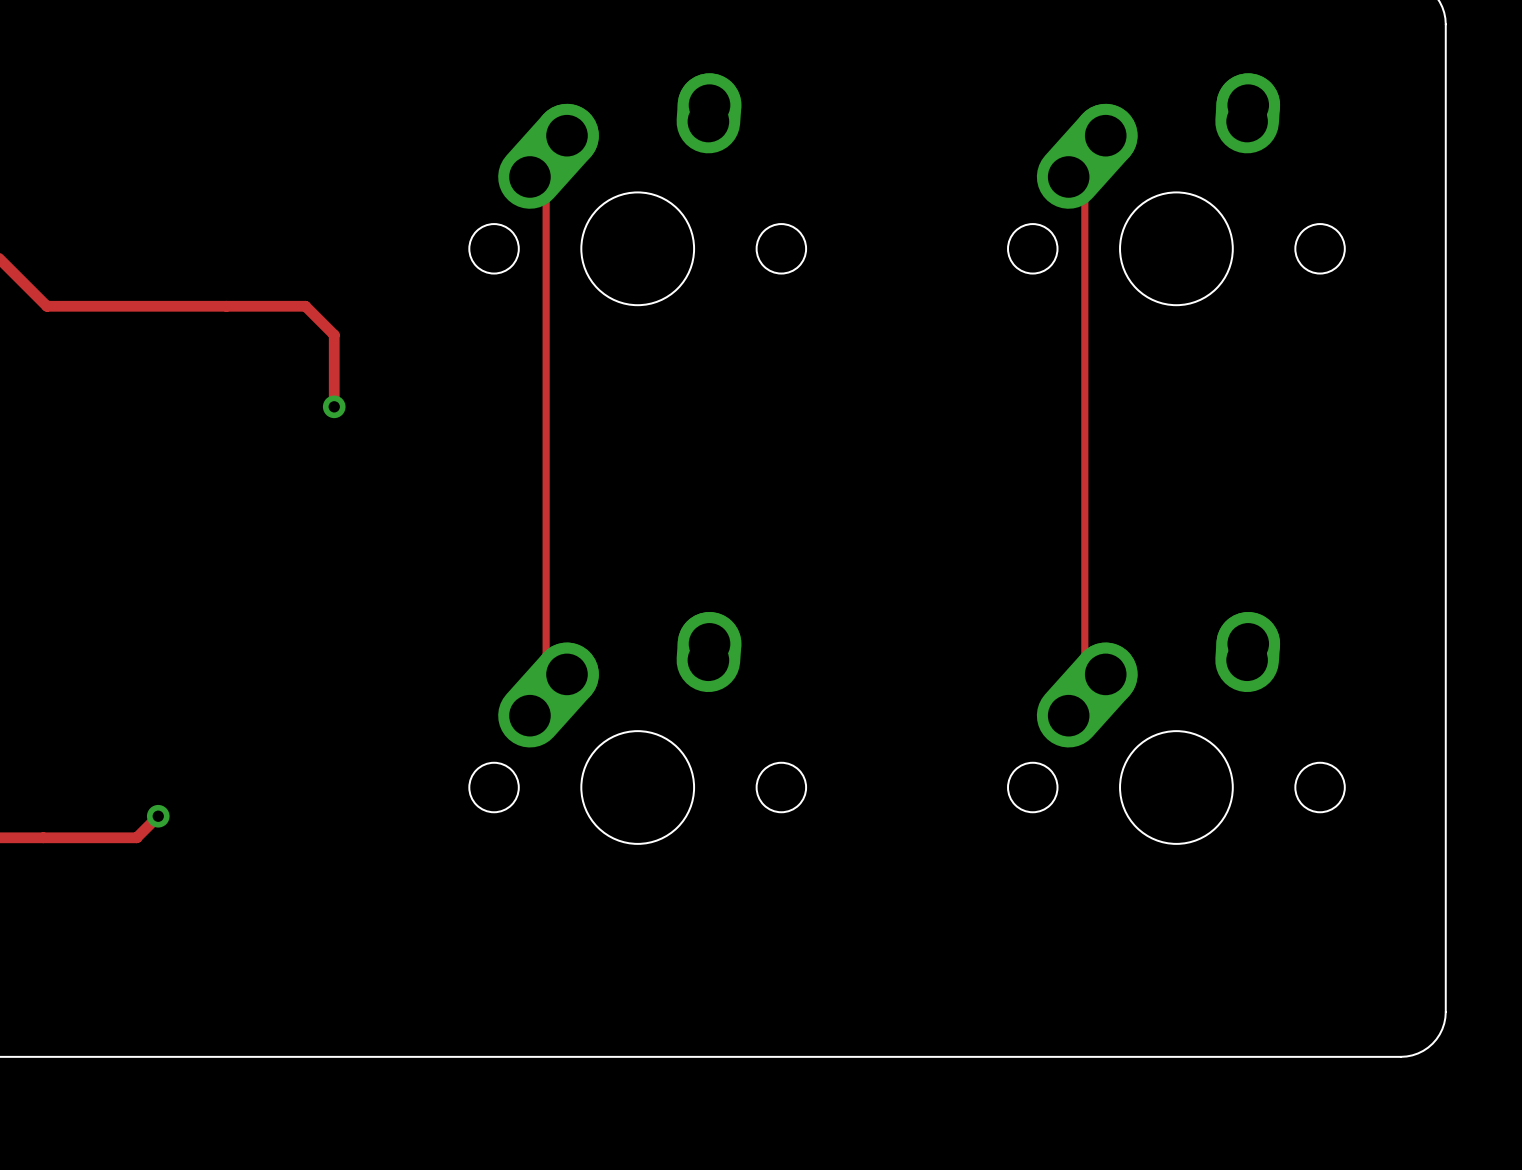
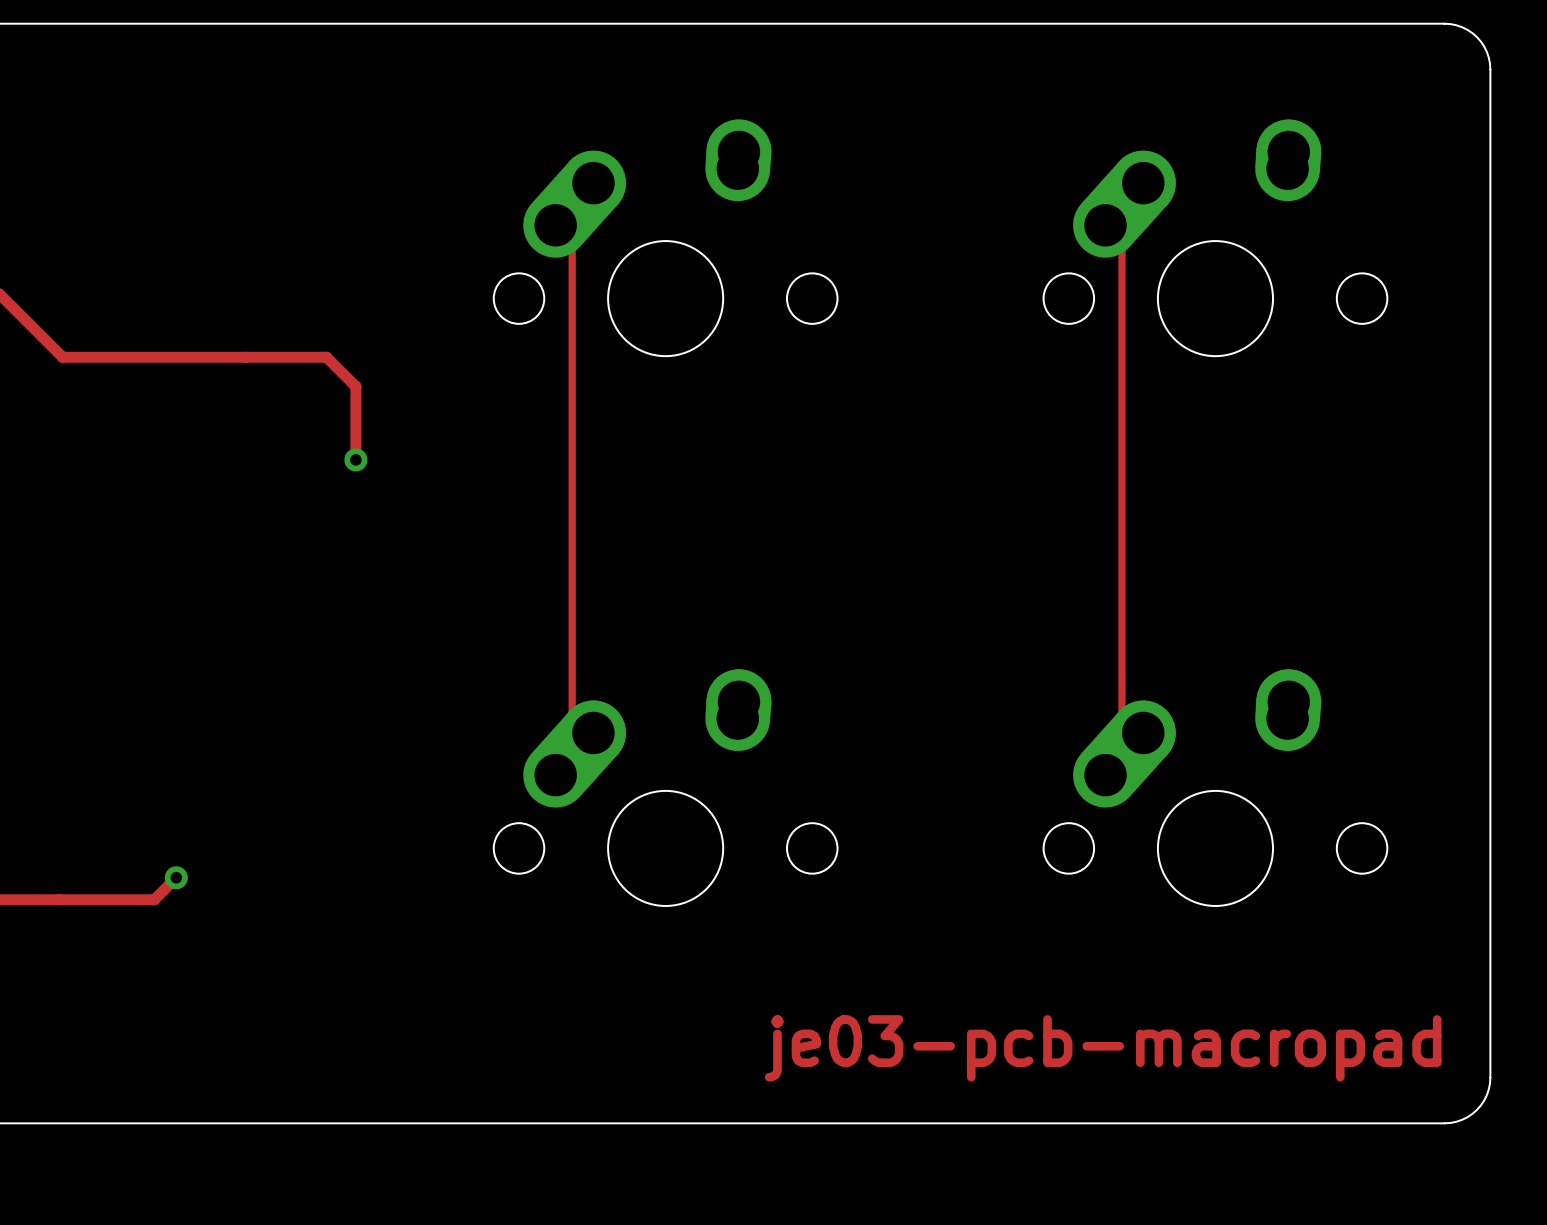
text: none -> je03-pcb-macropad (1103, 1048)

